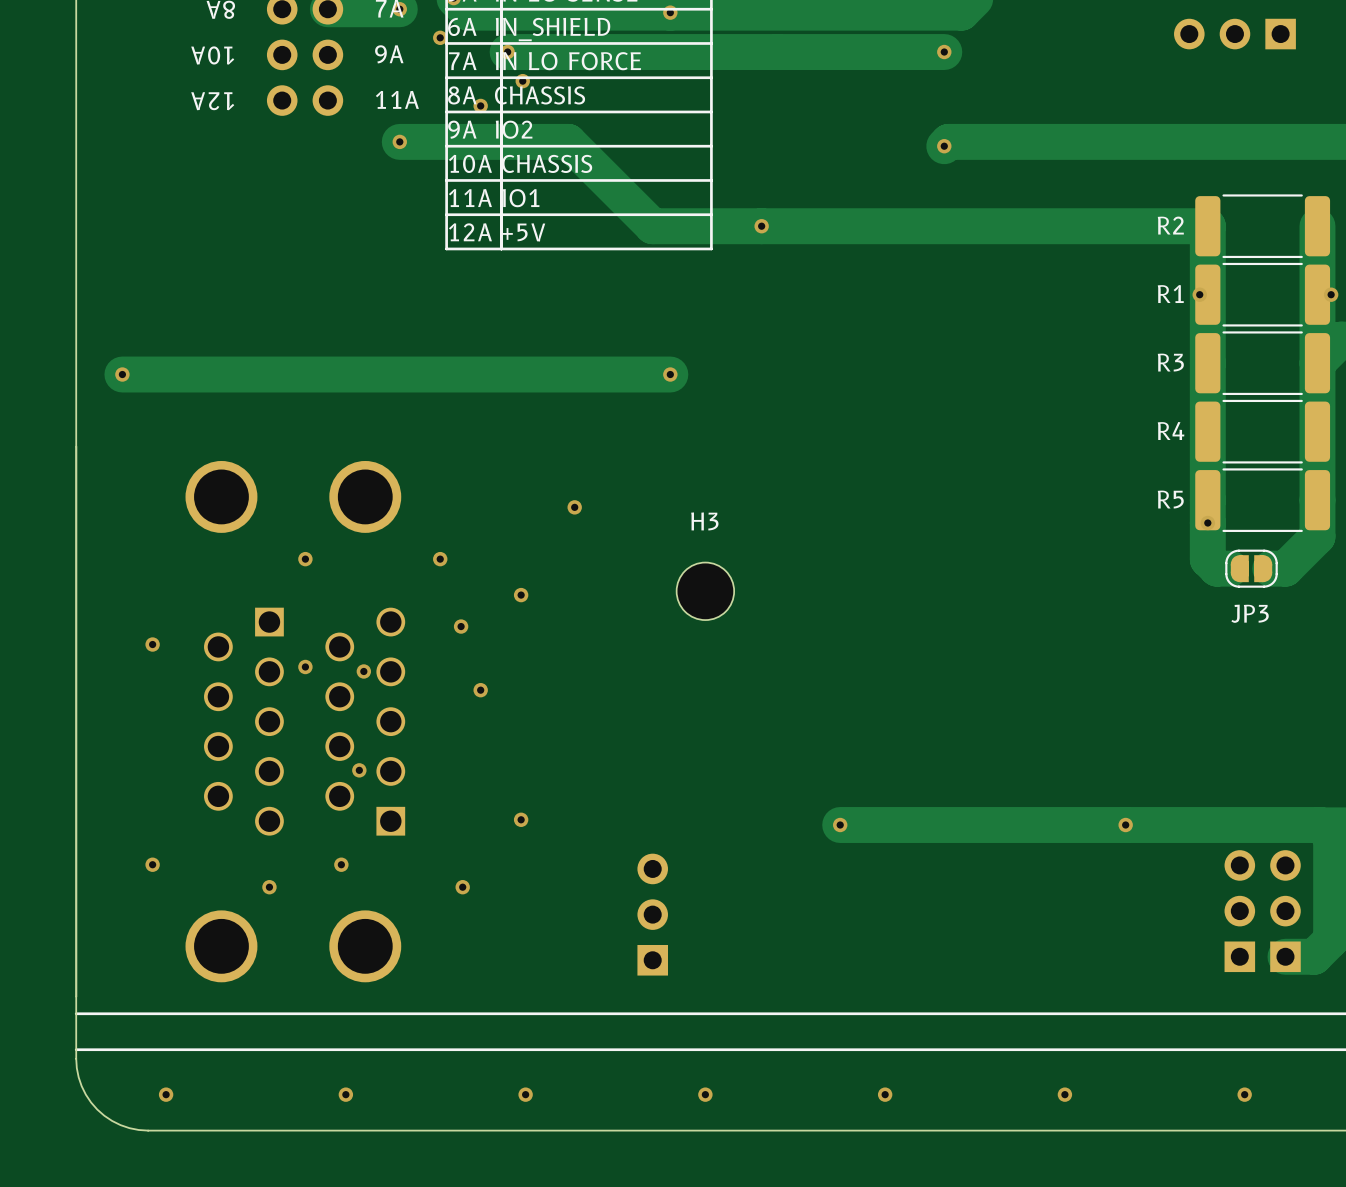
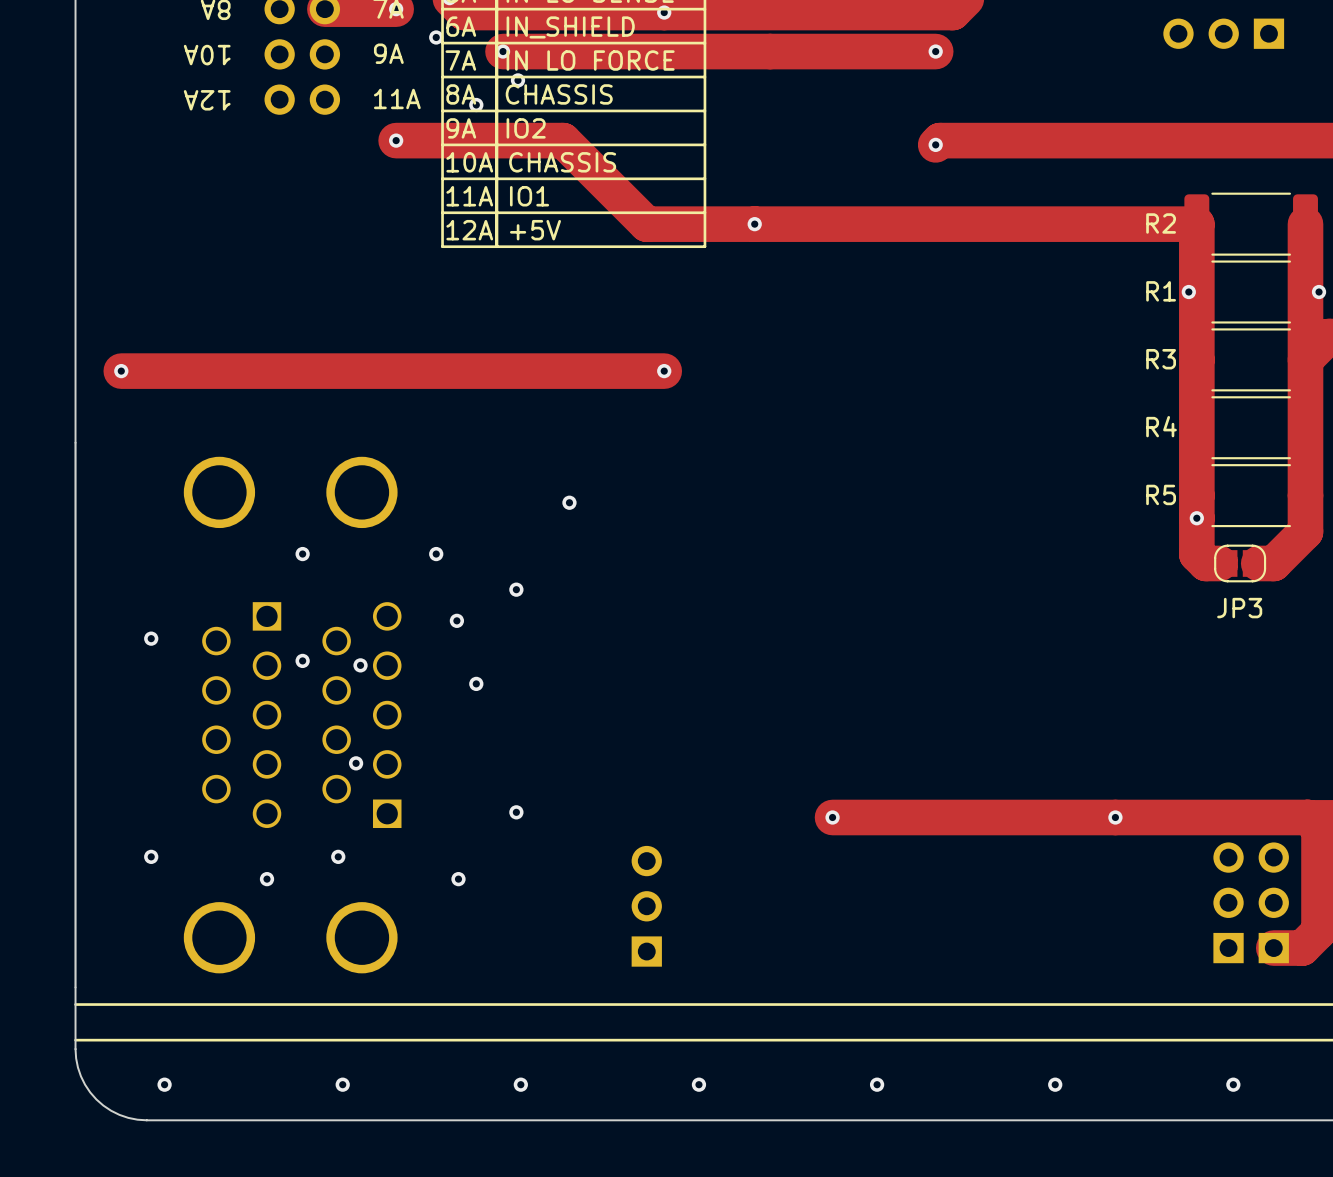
H3: (705, 591) -> none

